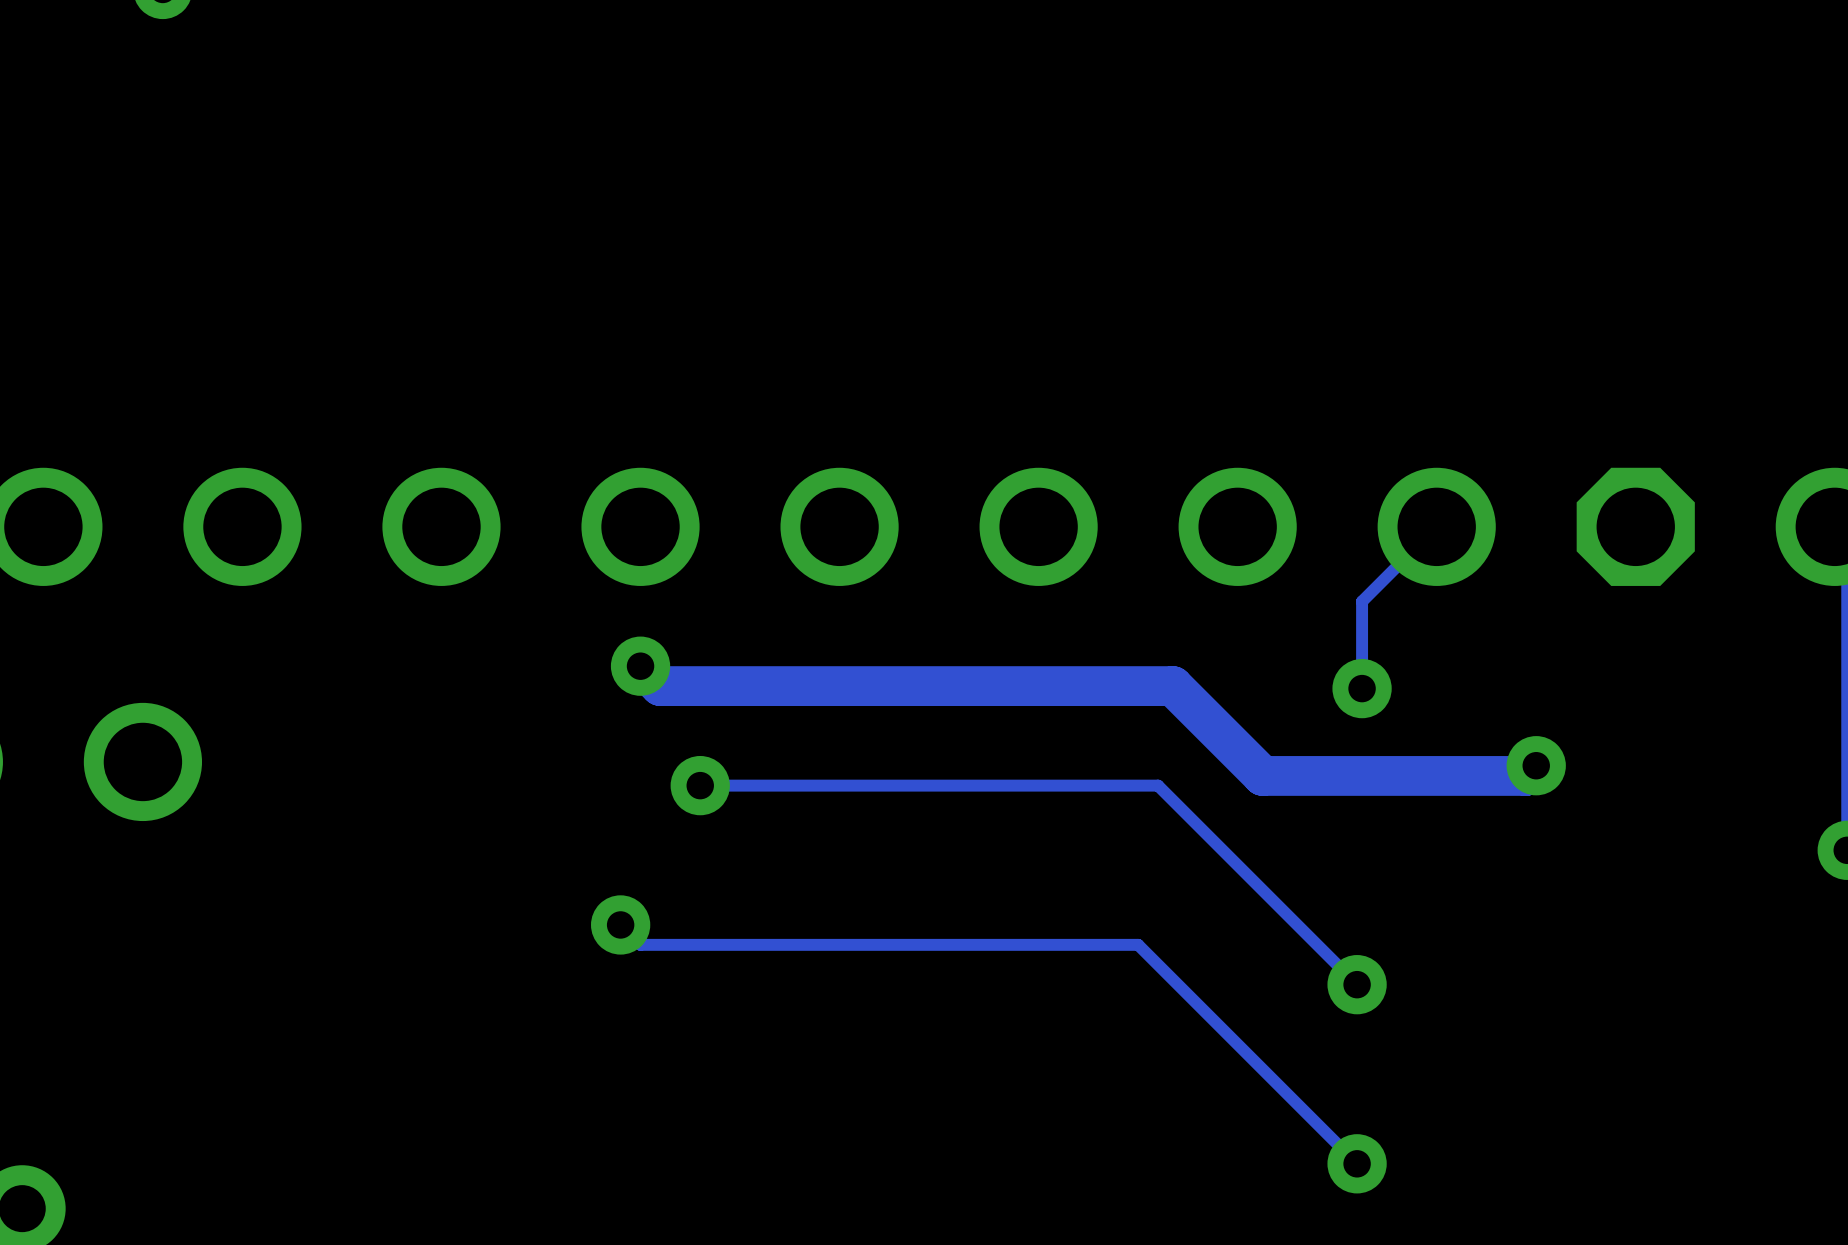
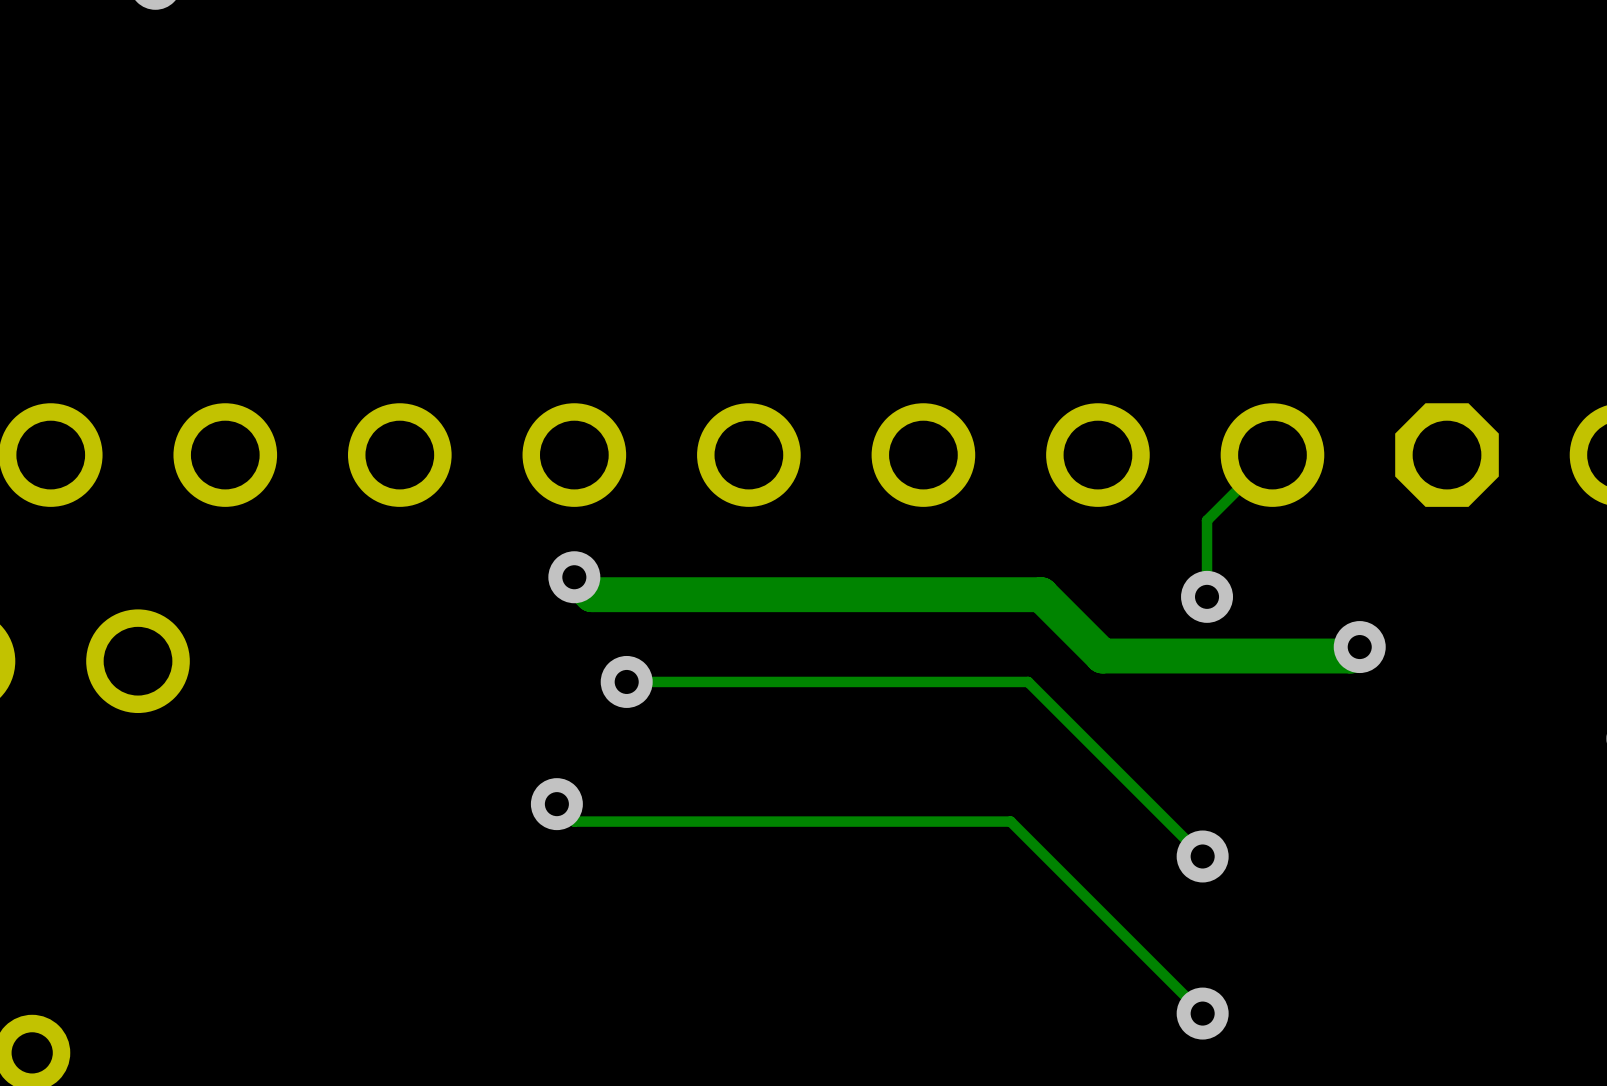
track: (1242, 756) (1262, 775) (1526, 775) (1536, 765) -> (1102, 656) (1350, 656) (1359, 647)
via position: (1536, 765) -> (1359, 647)

